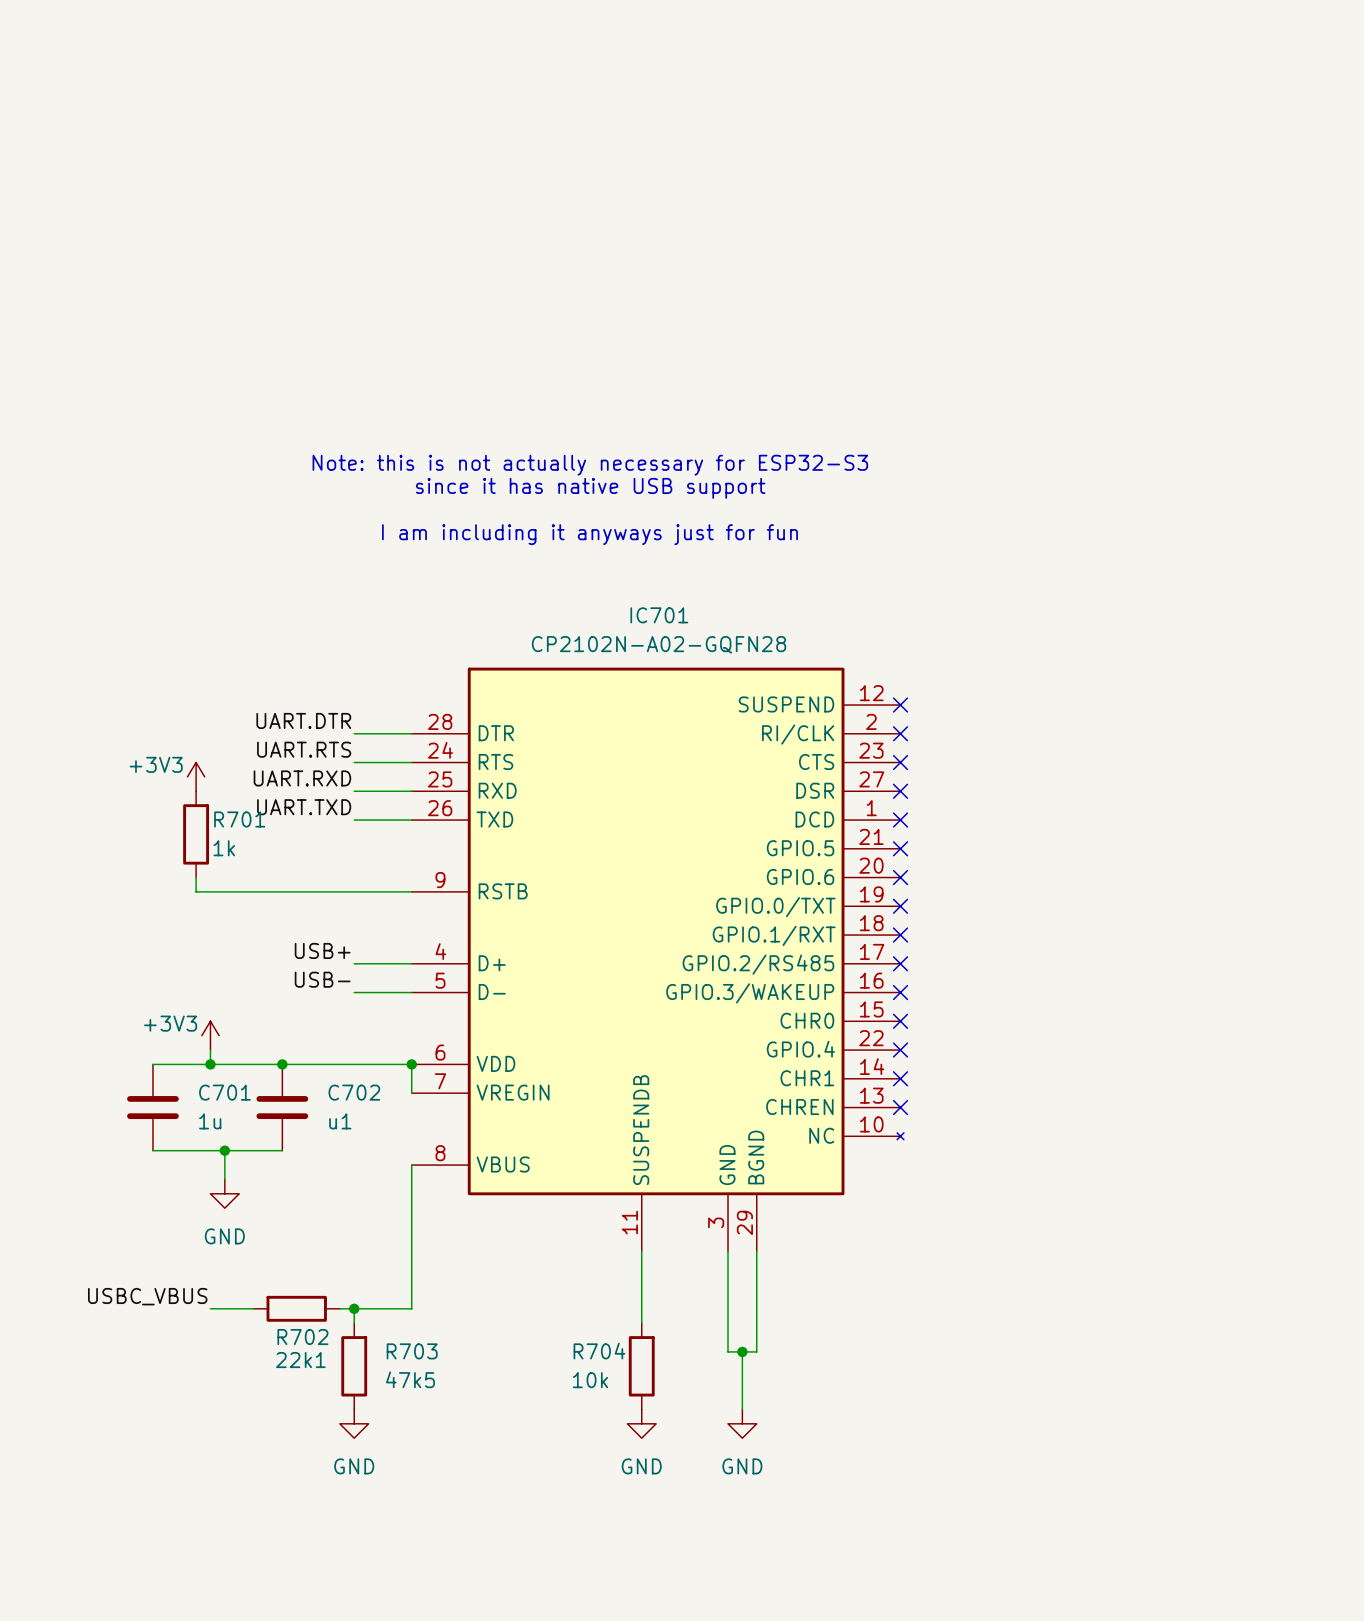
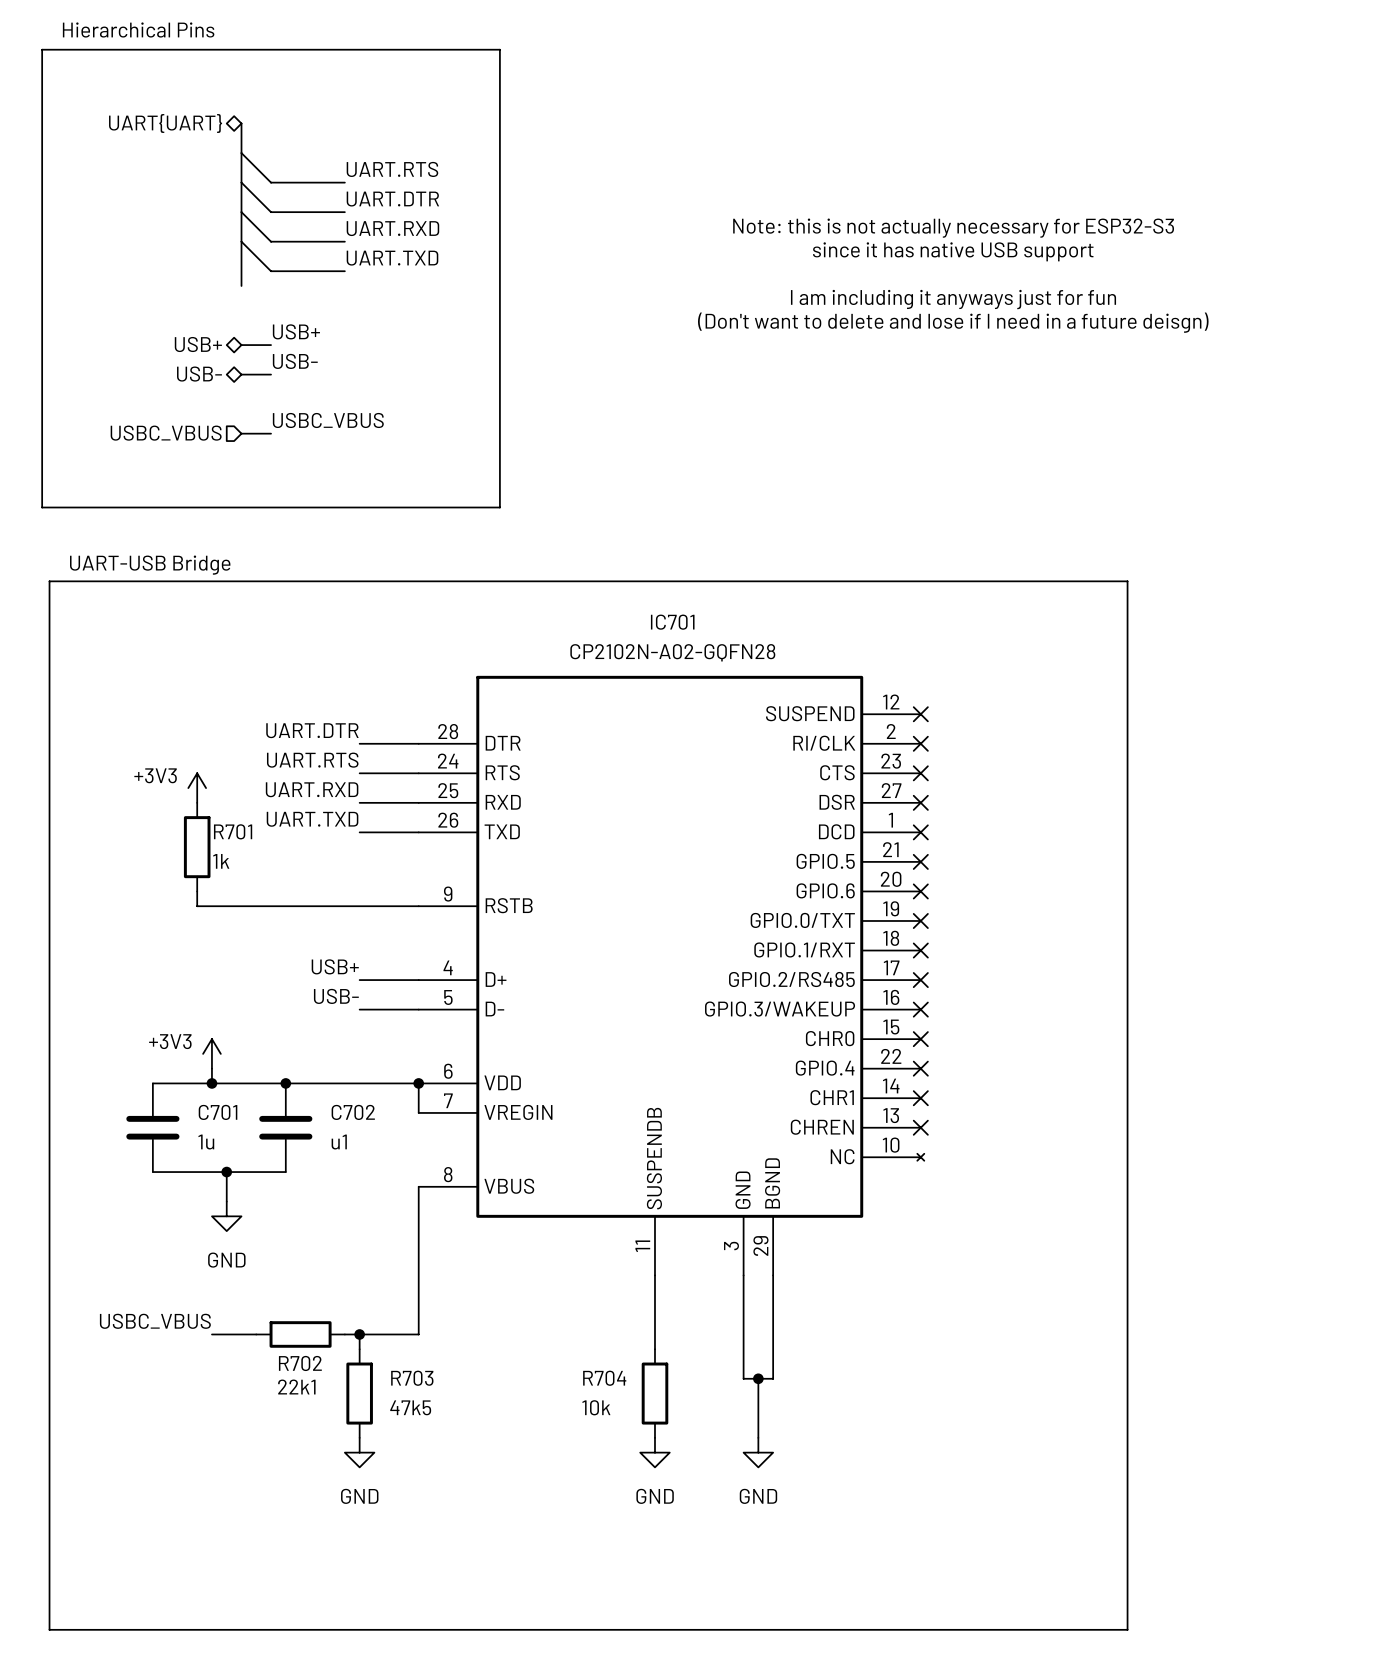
text: none -> Hierarchical Pins (138, 30)
line: none -> (42, 49) (499, 49) (499, 507) (42, 507) (42, 49)
bus: none -> (241, 123) (241, 285)
hierarchical label: none -> UART{UART} (165, 123)
wire: none -> (241, 153) (271, 182) (344, 182)
label: none -> UART.RTS (392, 169)
wire: none -> (241, 182) (271, 212) (344, 212)
label: none -> UART.DTR (392, 199)
wire: none -> (241, 212) (271, 241) (344, 241)
label: none -> UART.RXD (392, 228)
text: none -> Note: this is not actually necessary for ESP32-S3 (953, 228)
wire: none -> (241, 241) (271, 271) (344, 271)
text: none -> since it has native USB support (953, 251)
label: none -> UART.TXD (392, 258)
text: none -> I am including it anyways just for fun (953, 299)
text: none -> (Don't want to delete and lose if I need in a future deisgn) (953, 322)
label: none -> USB+ (296, 331)
hierarchical label: none -> USB+ (198, 344)
wire: none -> (241, 345) (271, 345)
label: none -> USB- (295, 361)
hierarchical label: none -> USB- (199, 374)
wire: none -> (241, 374) (271, 374)
label: none -> USBC_VBUS (328, 420)
wire: none -> (241, 433) (271, 433)
hierarchical label: none -> USBC_VBUS (166, 433)
text: Note: this is not actually necessary for ESP32-S3 (590, 465) -> none
text: since it has native USB support (590, 488) -> none
text: I am including it anyways just for fun (589, 534) -> none
text: none -> UART-USB Bridge (150, 565)
line: none -> (49, 581) (1127, 581) (1127, 1629) (49, 1629) (49, 581)

